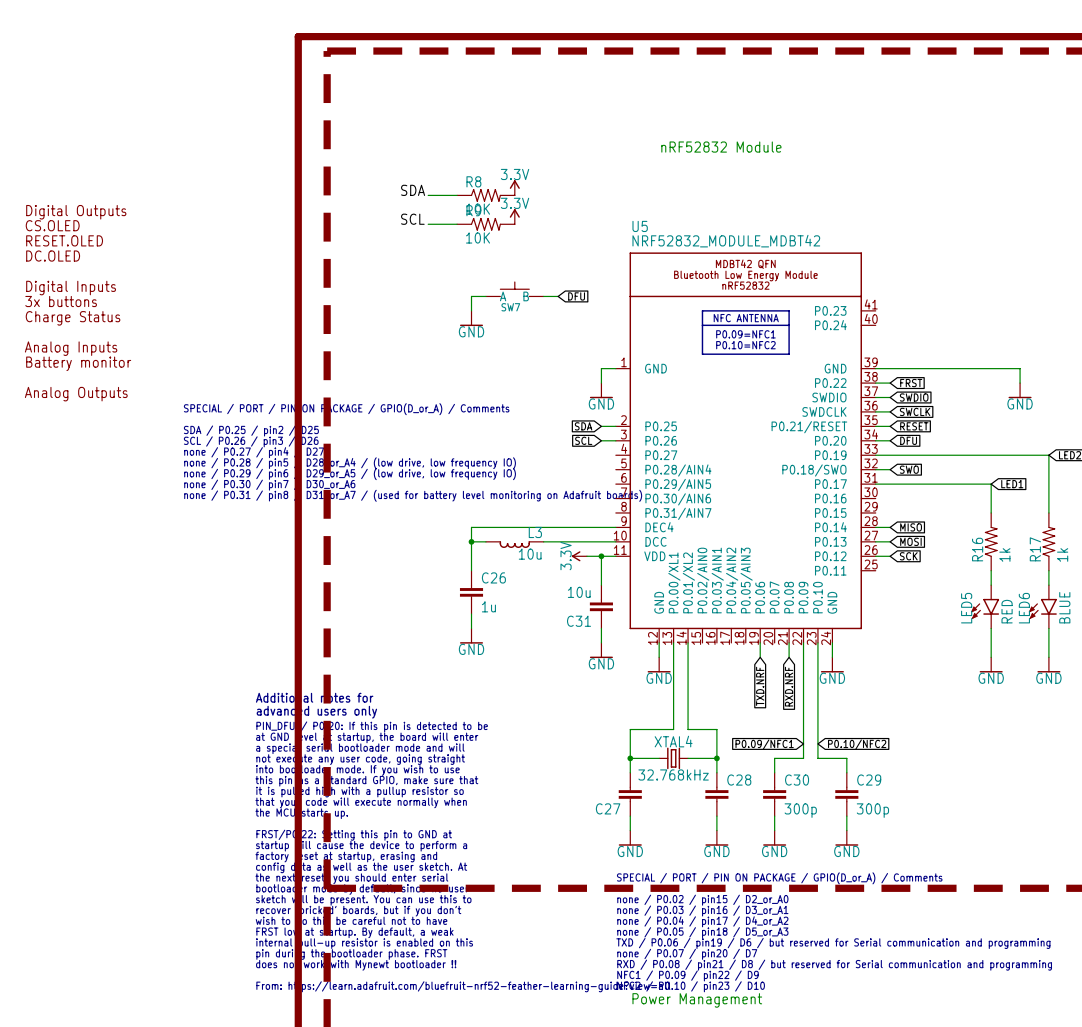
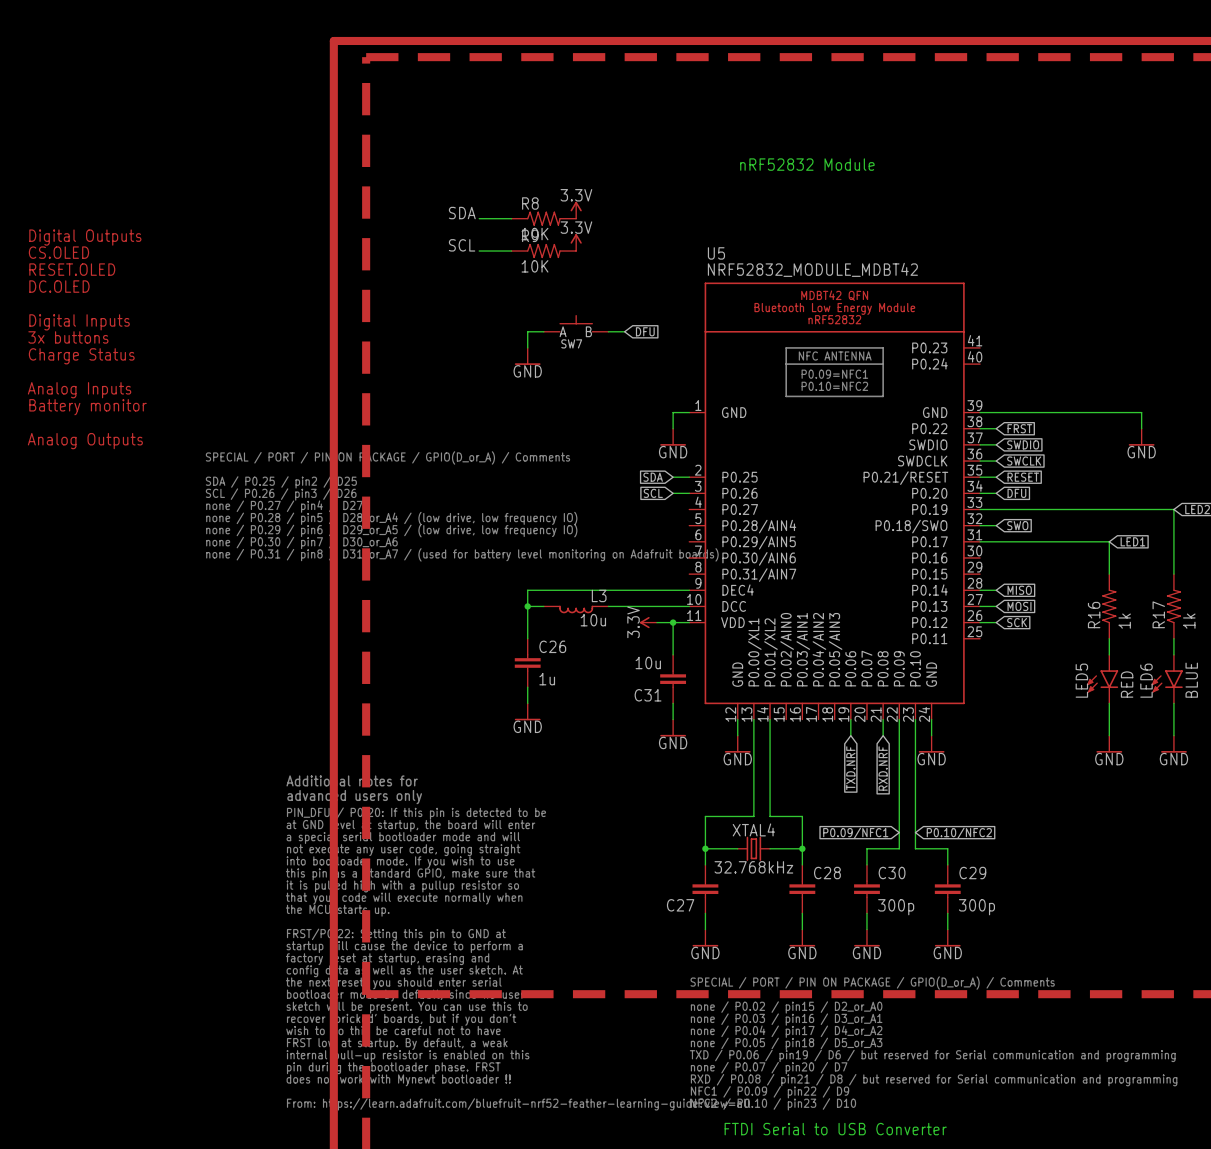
text: Power Management (697, 1000) -> none
text: none -> FTDI Serial to USB Converter (835, 1129)

